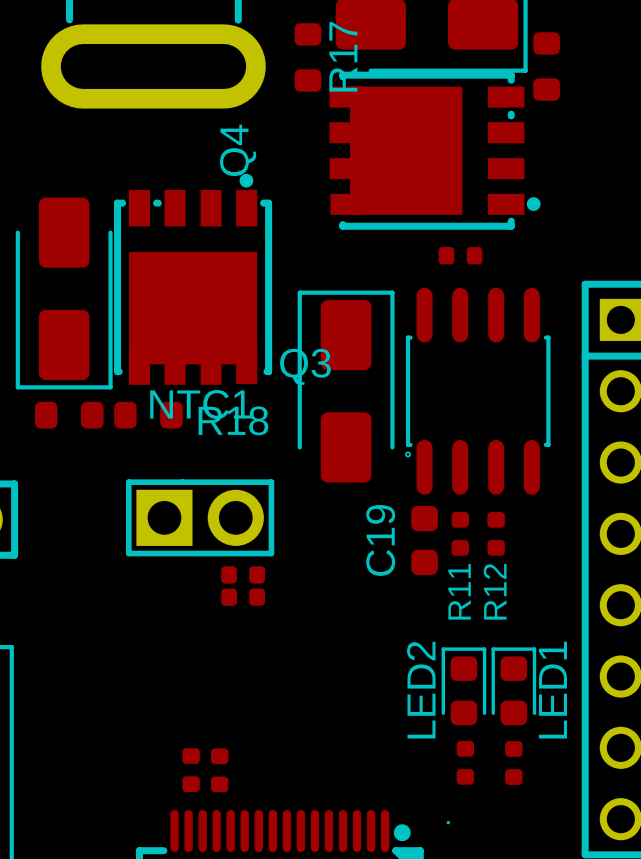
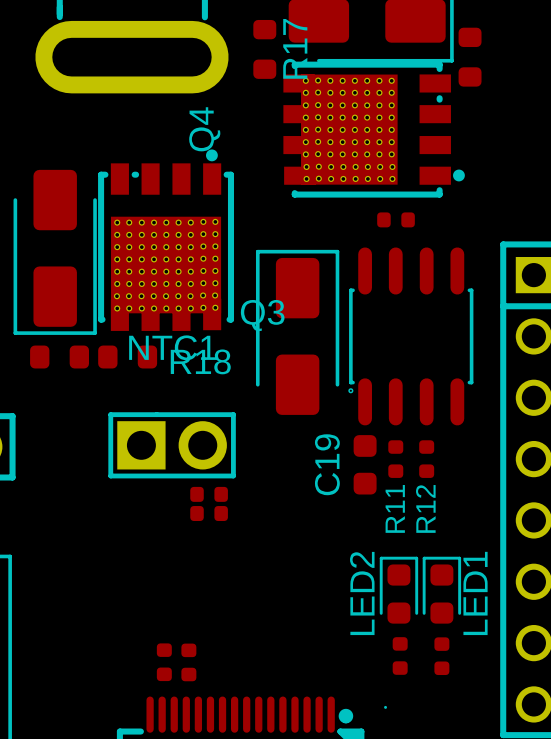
Q4 footprint: [329, 71, 541, 230] -> [283, 61, 465, 198]
Q3 footprint: [114, 173, 273, 385] -> [98, 149, 235, 331]

